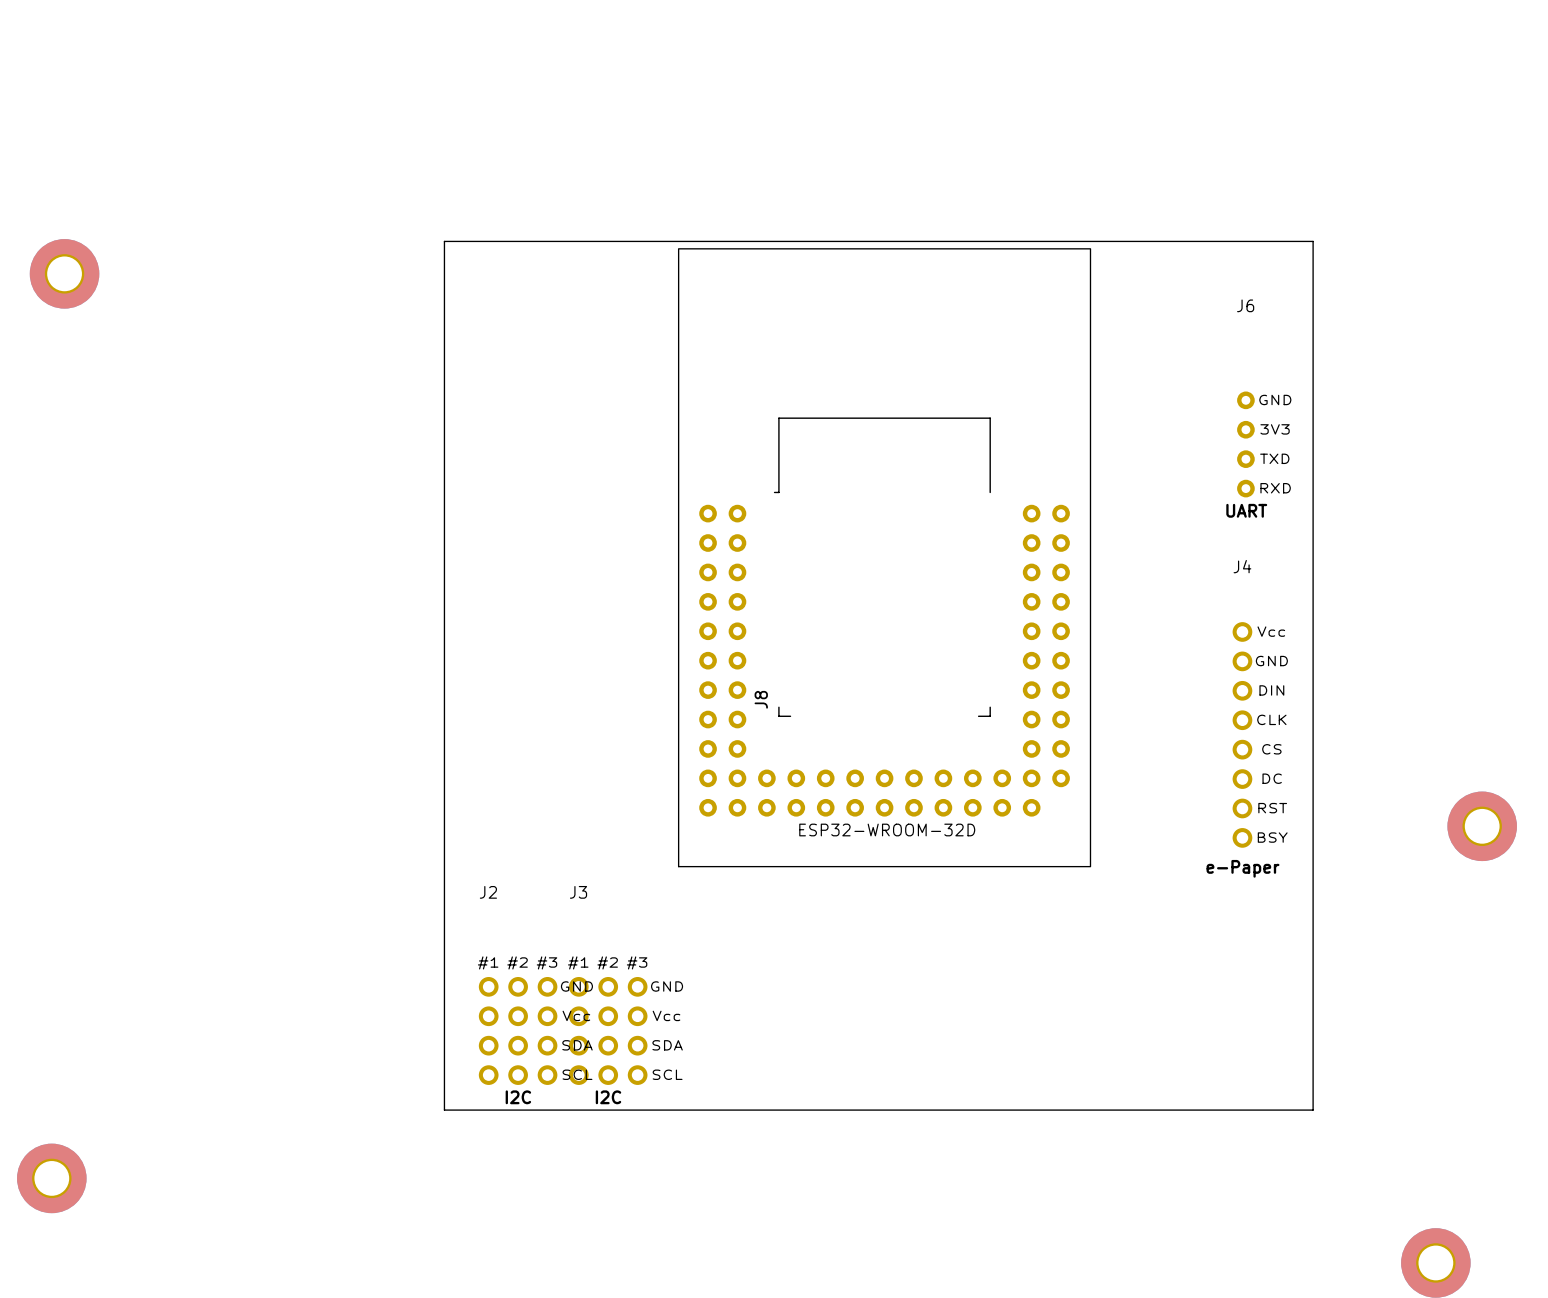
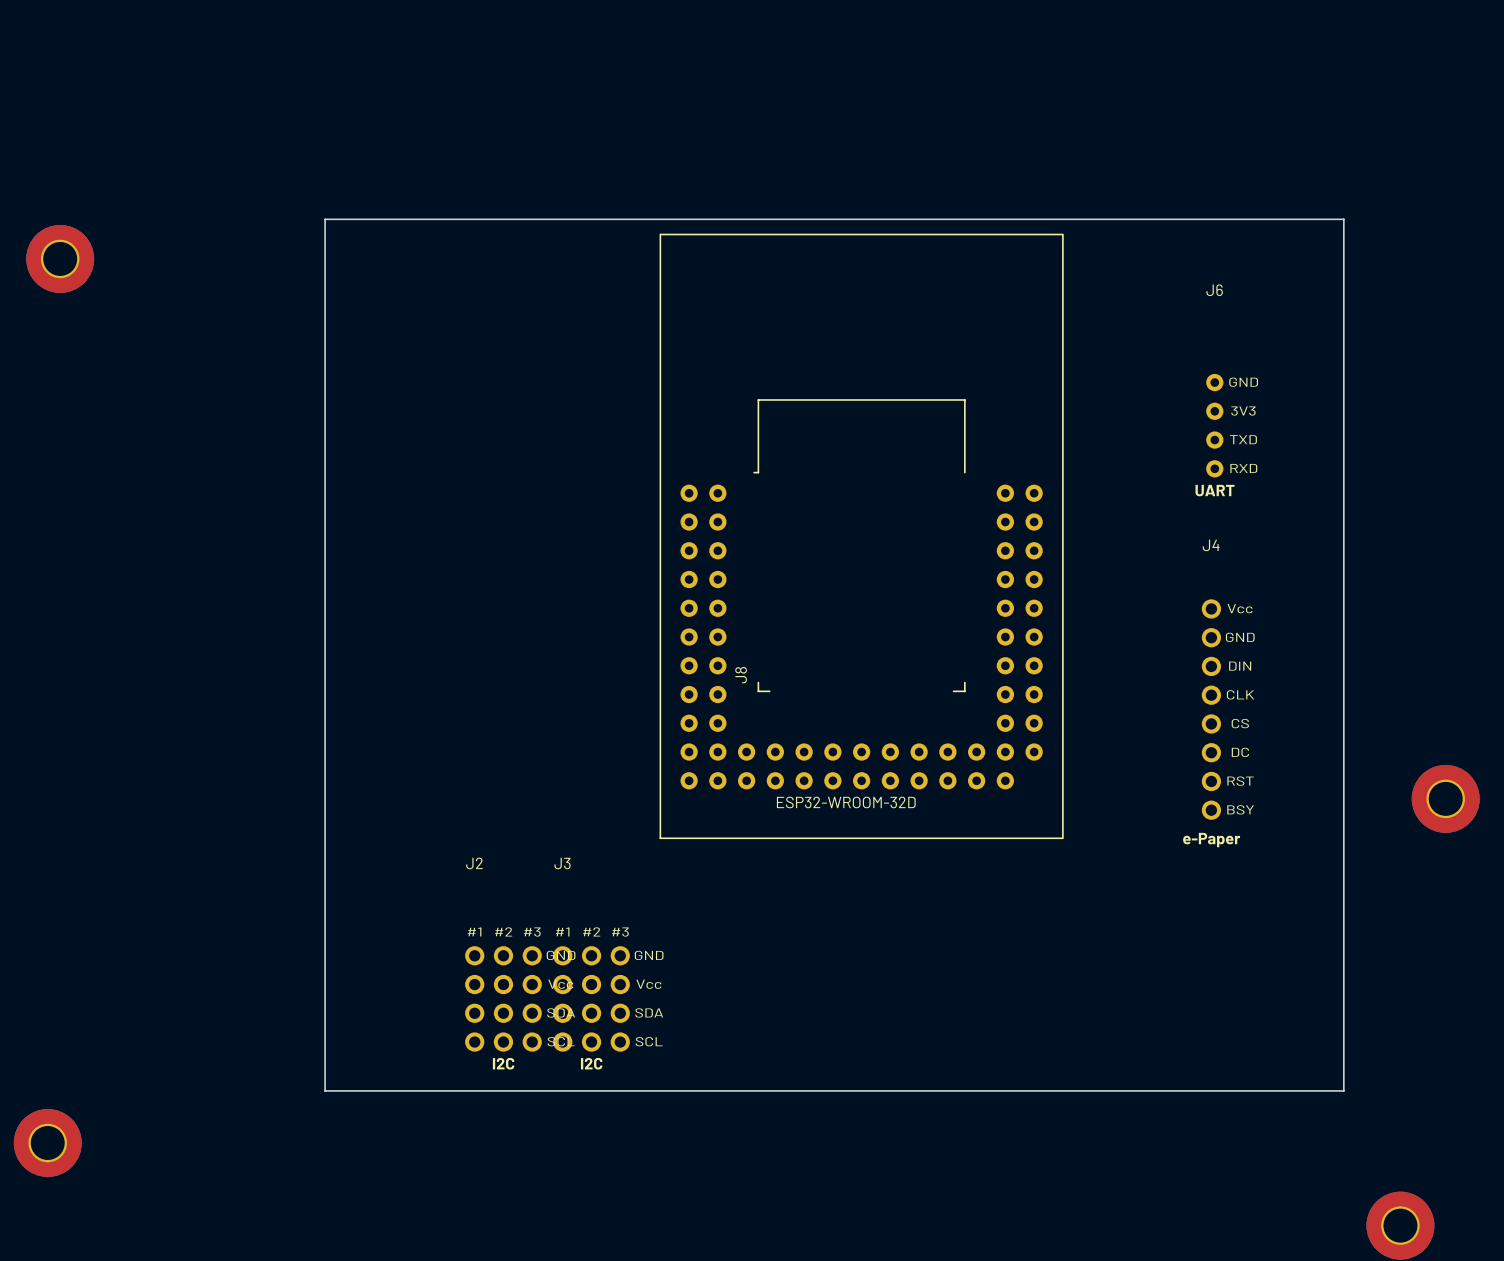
board edge: (444, 241) (1313, 241) (1313, 1110) (444, 1110) (444, 241) -> (325, 219) (325, 1090) (1343, 1090) (1343, 219) (325, 219)

